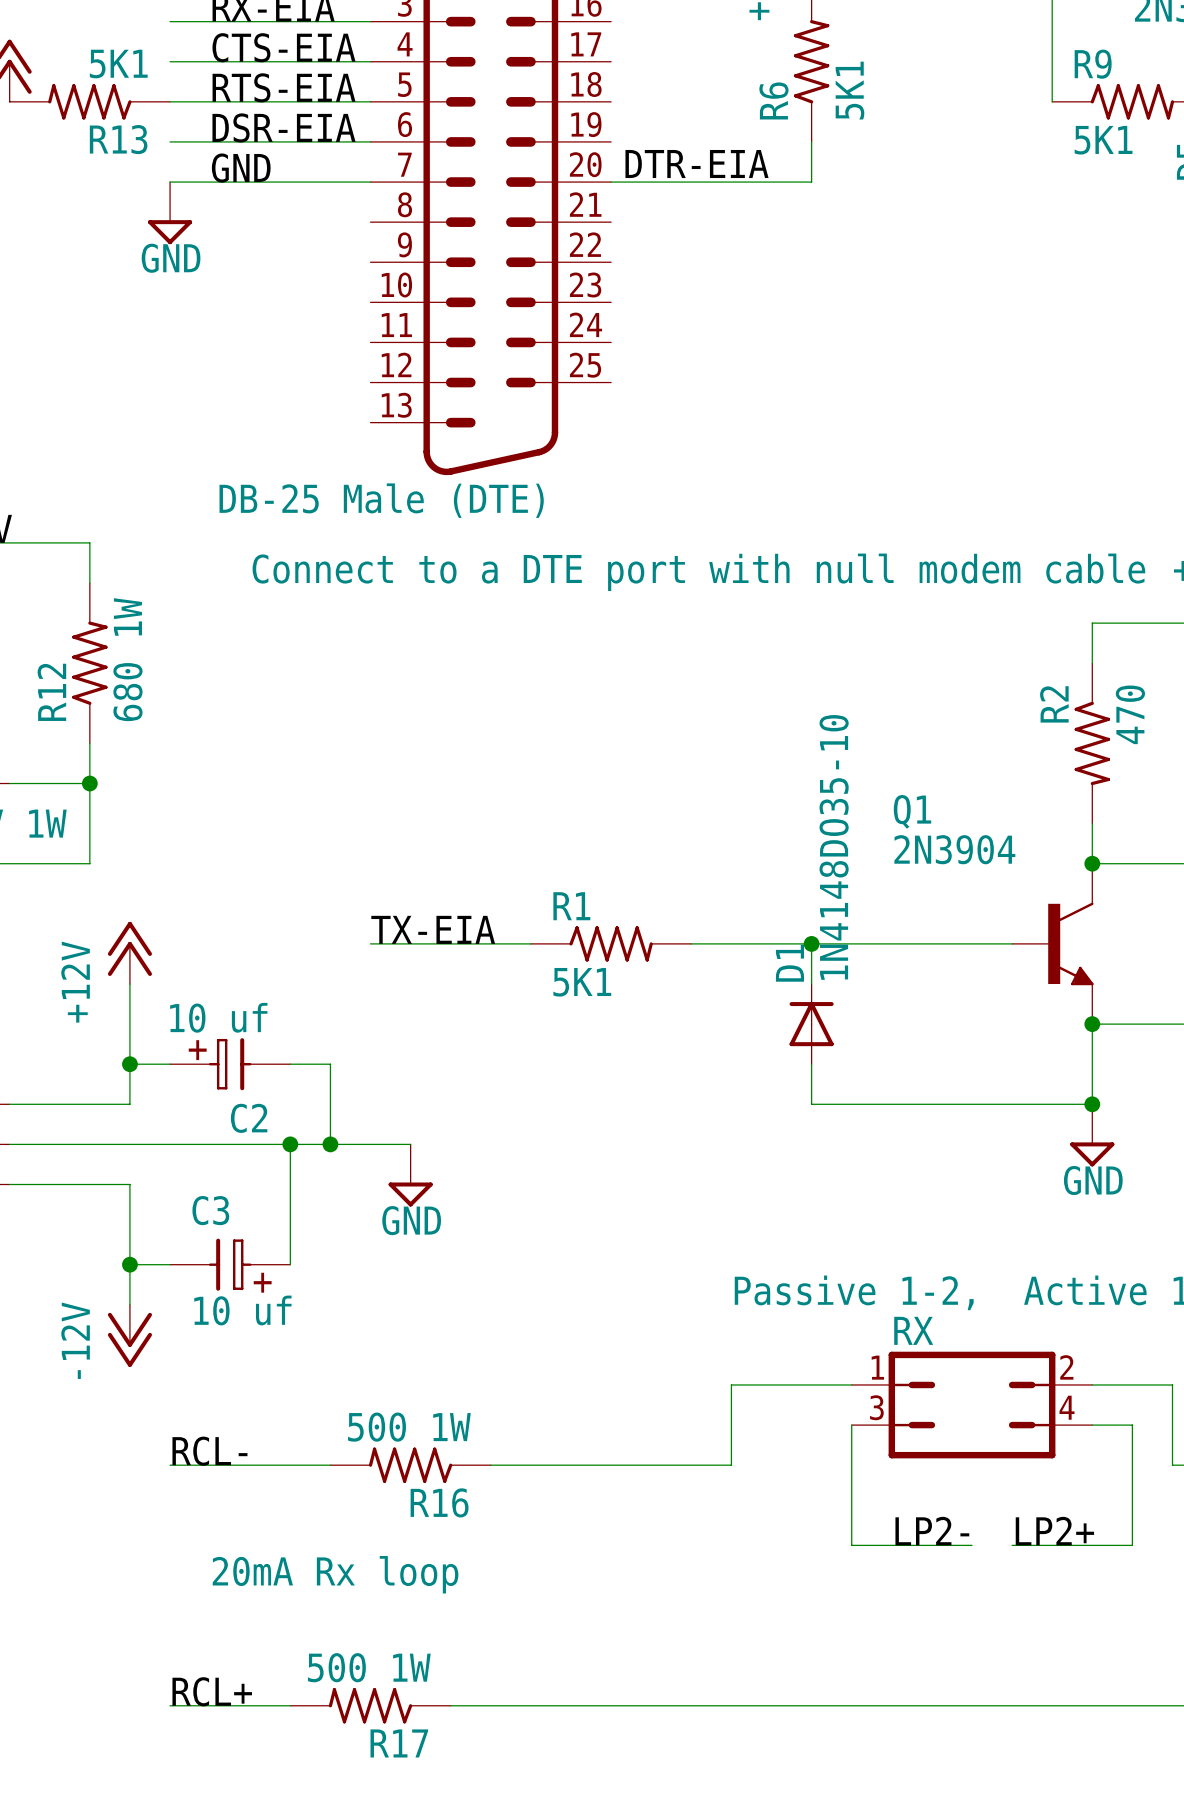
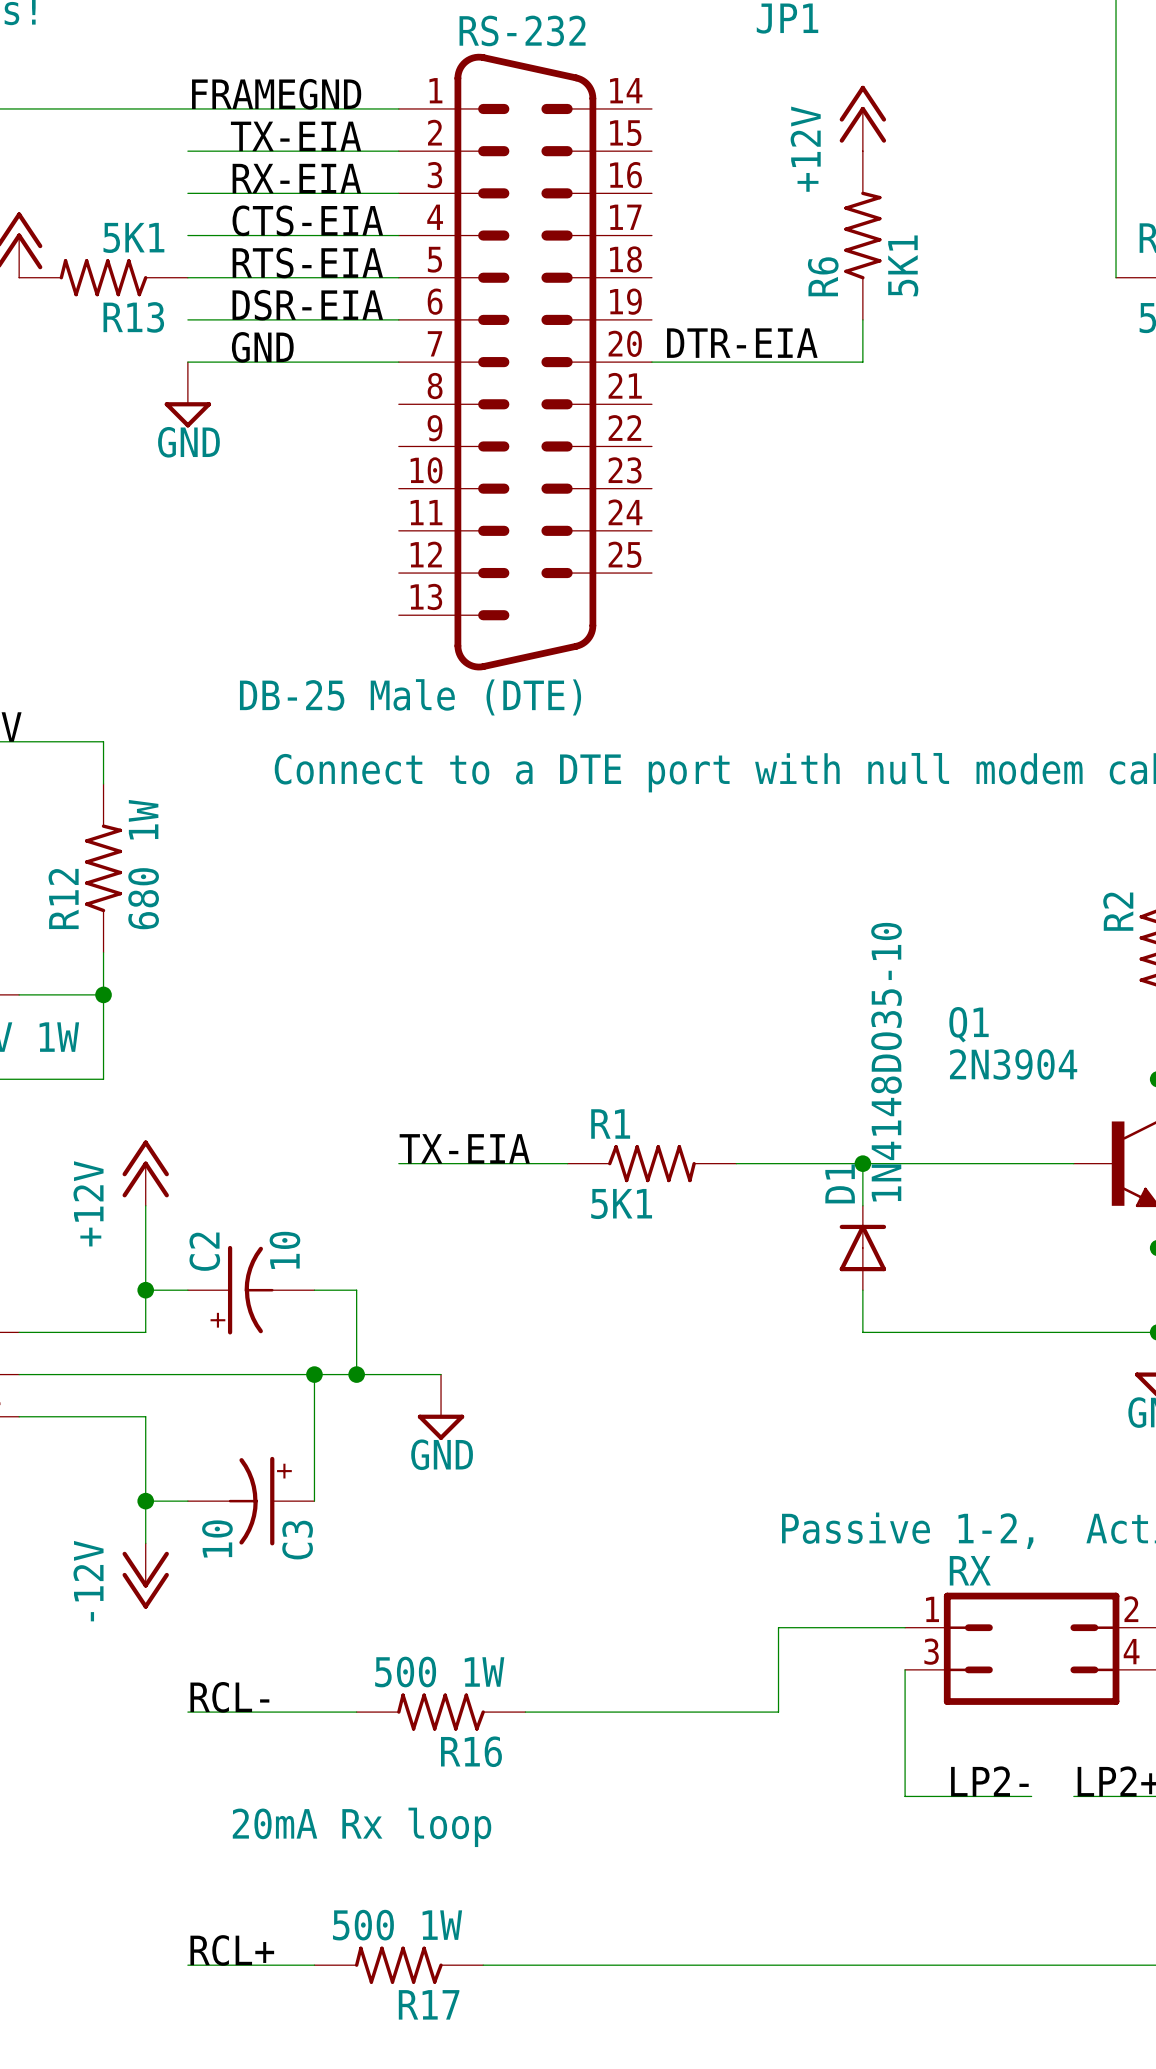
C2 value: 10 uf (218, 1017) -> 10 (284, 1250)
C2 symbol: [170, 1038, 291, 1091] -> [187, 1245, 315, 1335]
C2 name position: C2 (249, 1118) -> C2 (204, 1251)
C3 name position: C3 (210, 1210) -> C3 (297, 1540)
C3 symbol: [170, 1238, 291, 1291] -> [187, 1456, 315, 1546]
C3 value: 10 uf (242, 1310) -> 10 (217, 1538)

